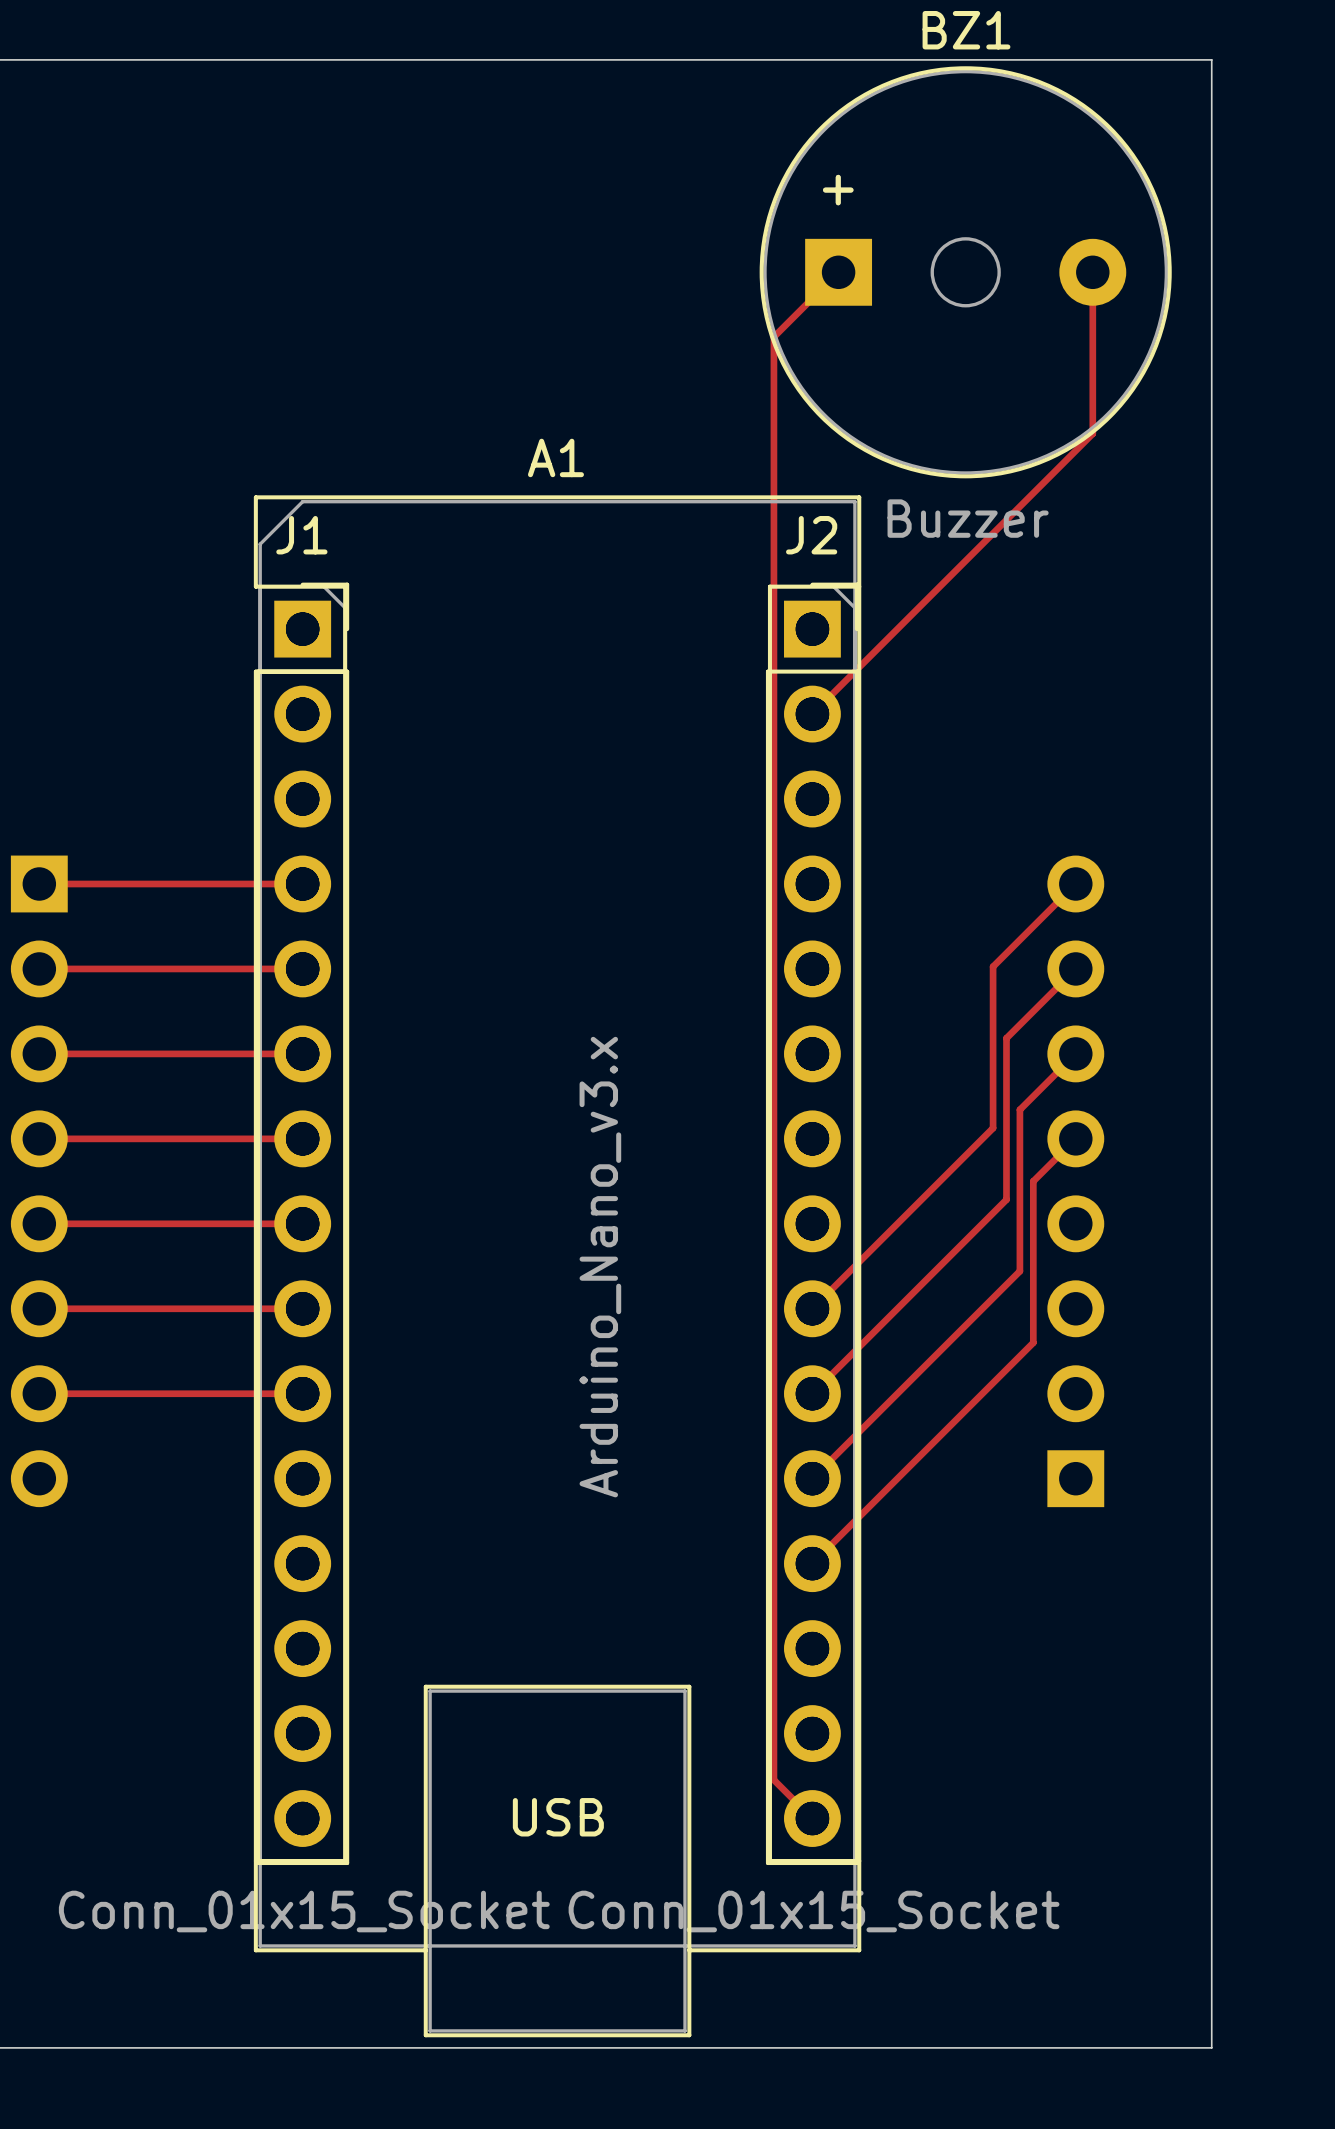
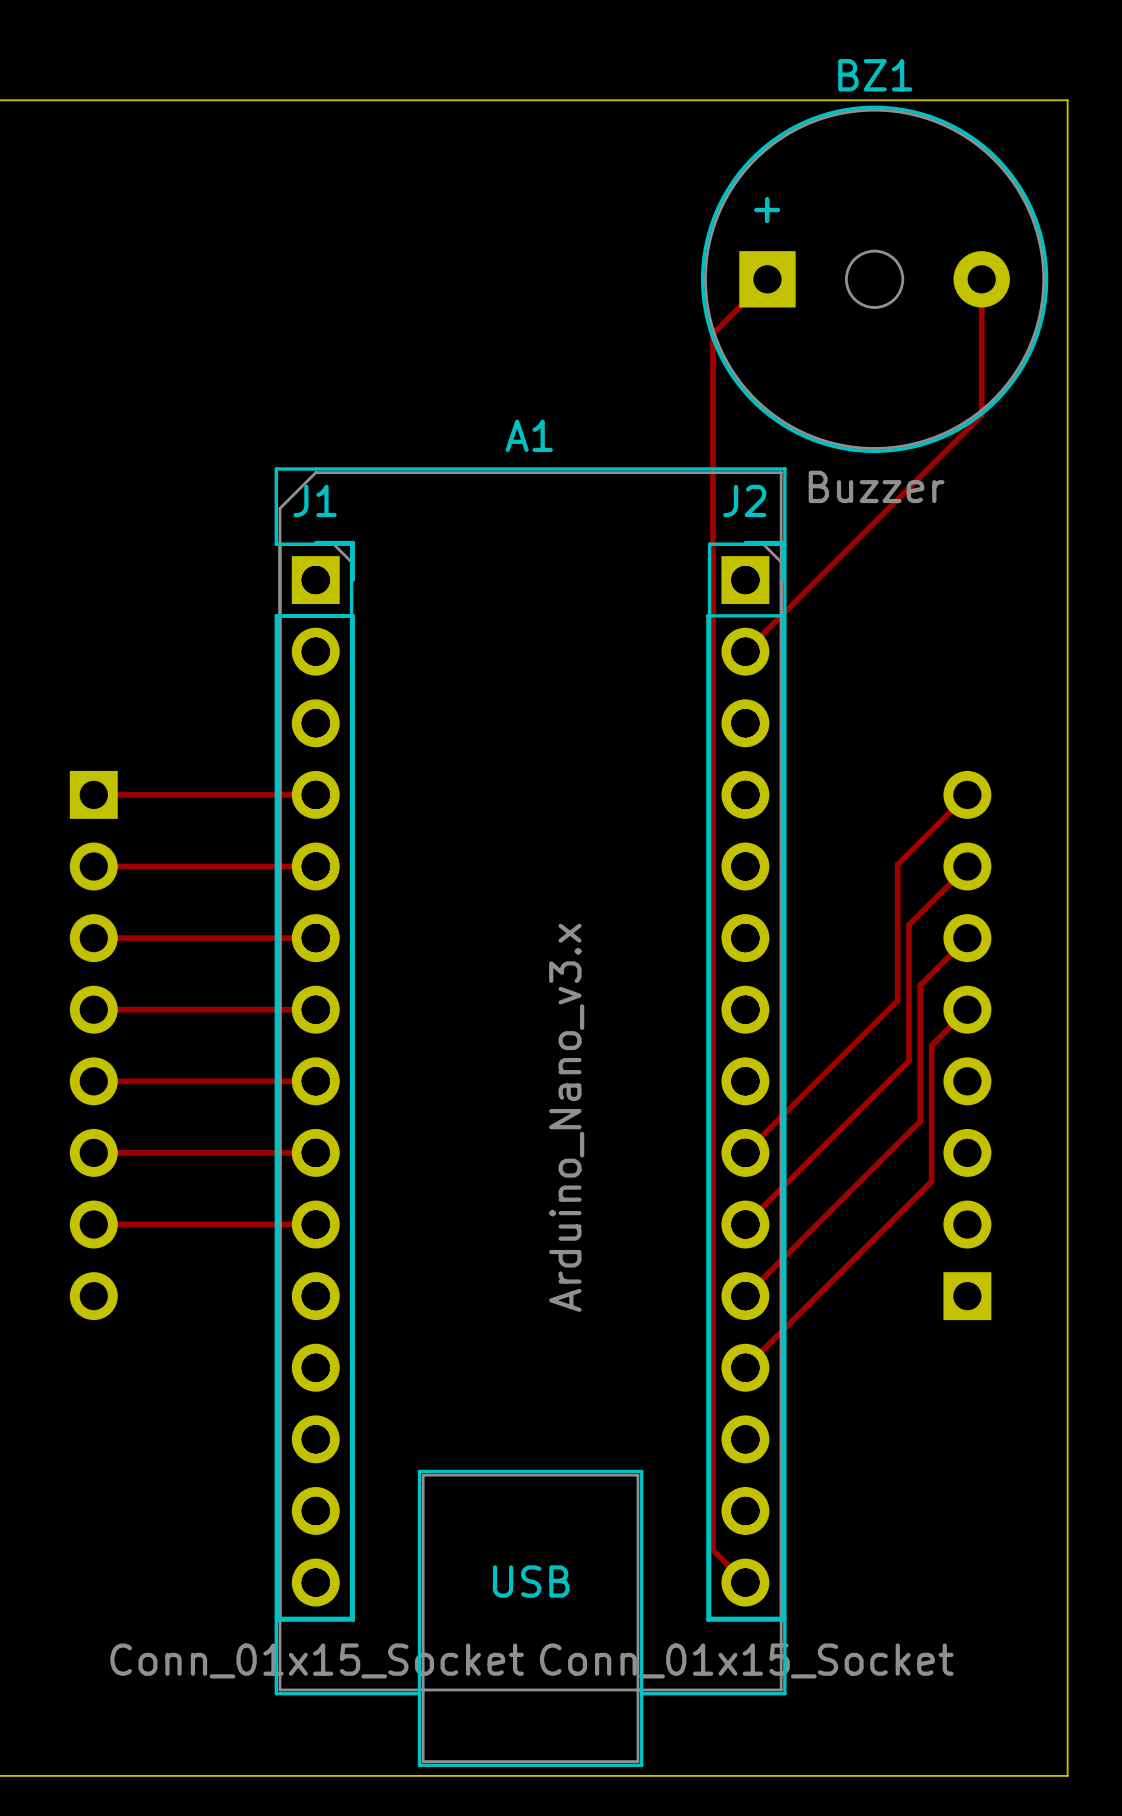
board edge: (1194, 59) (1211, 59) (1211, 2047) (1194, 2047) -> (1067, 100) (1067, 1775)

